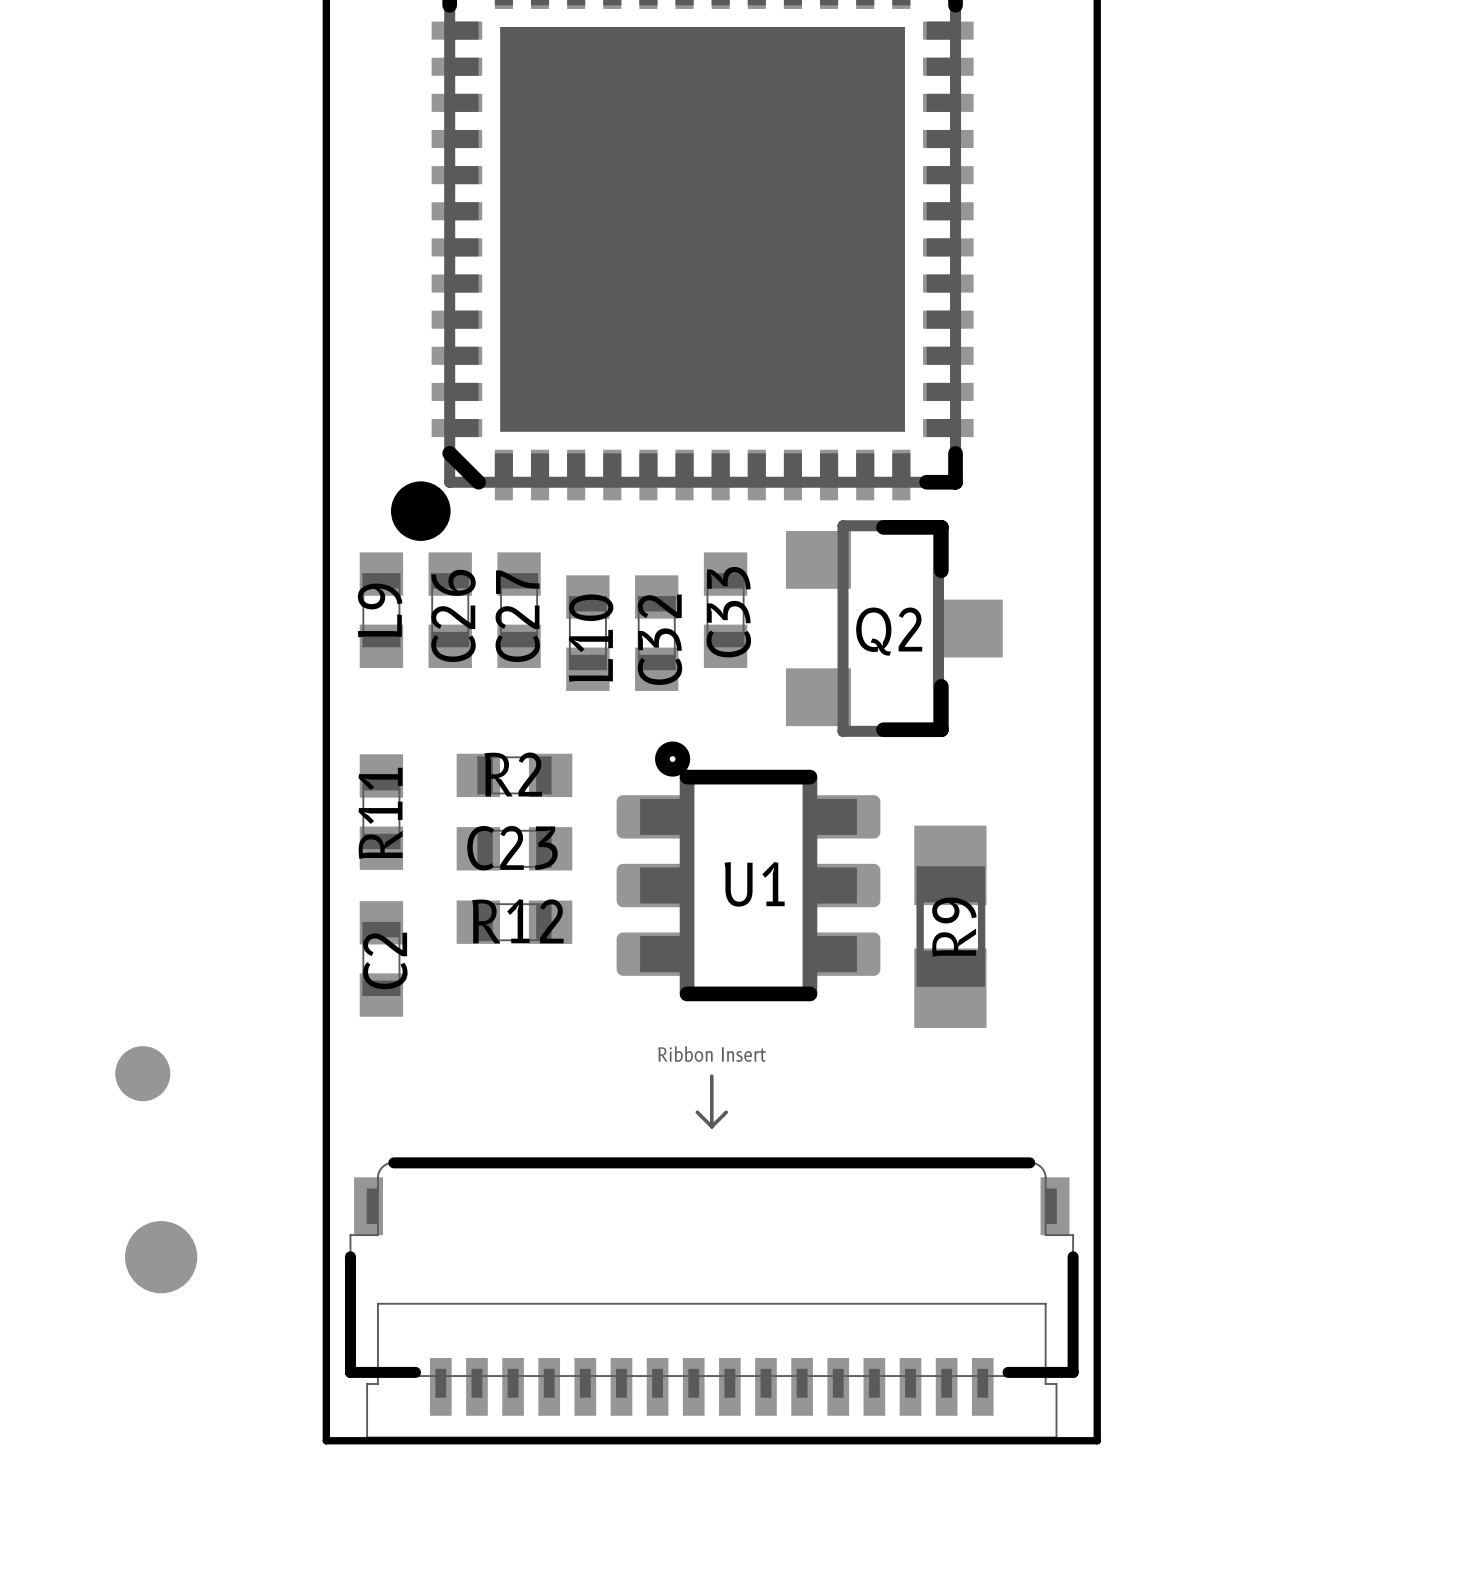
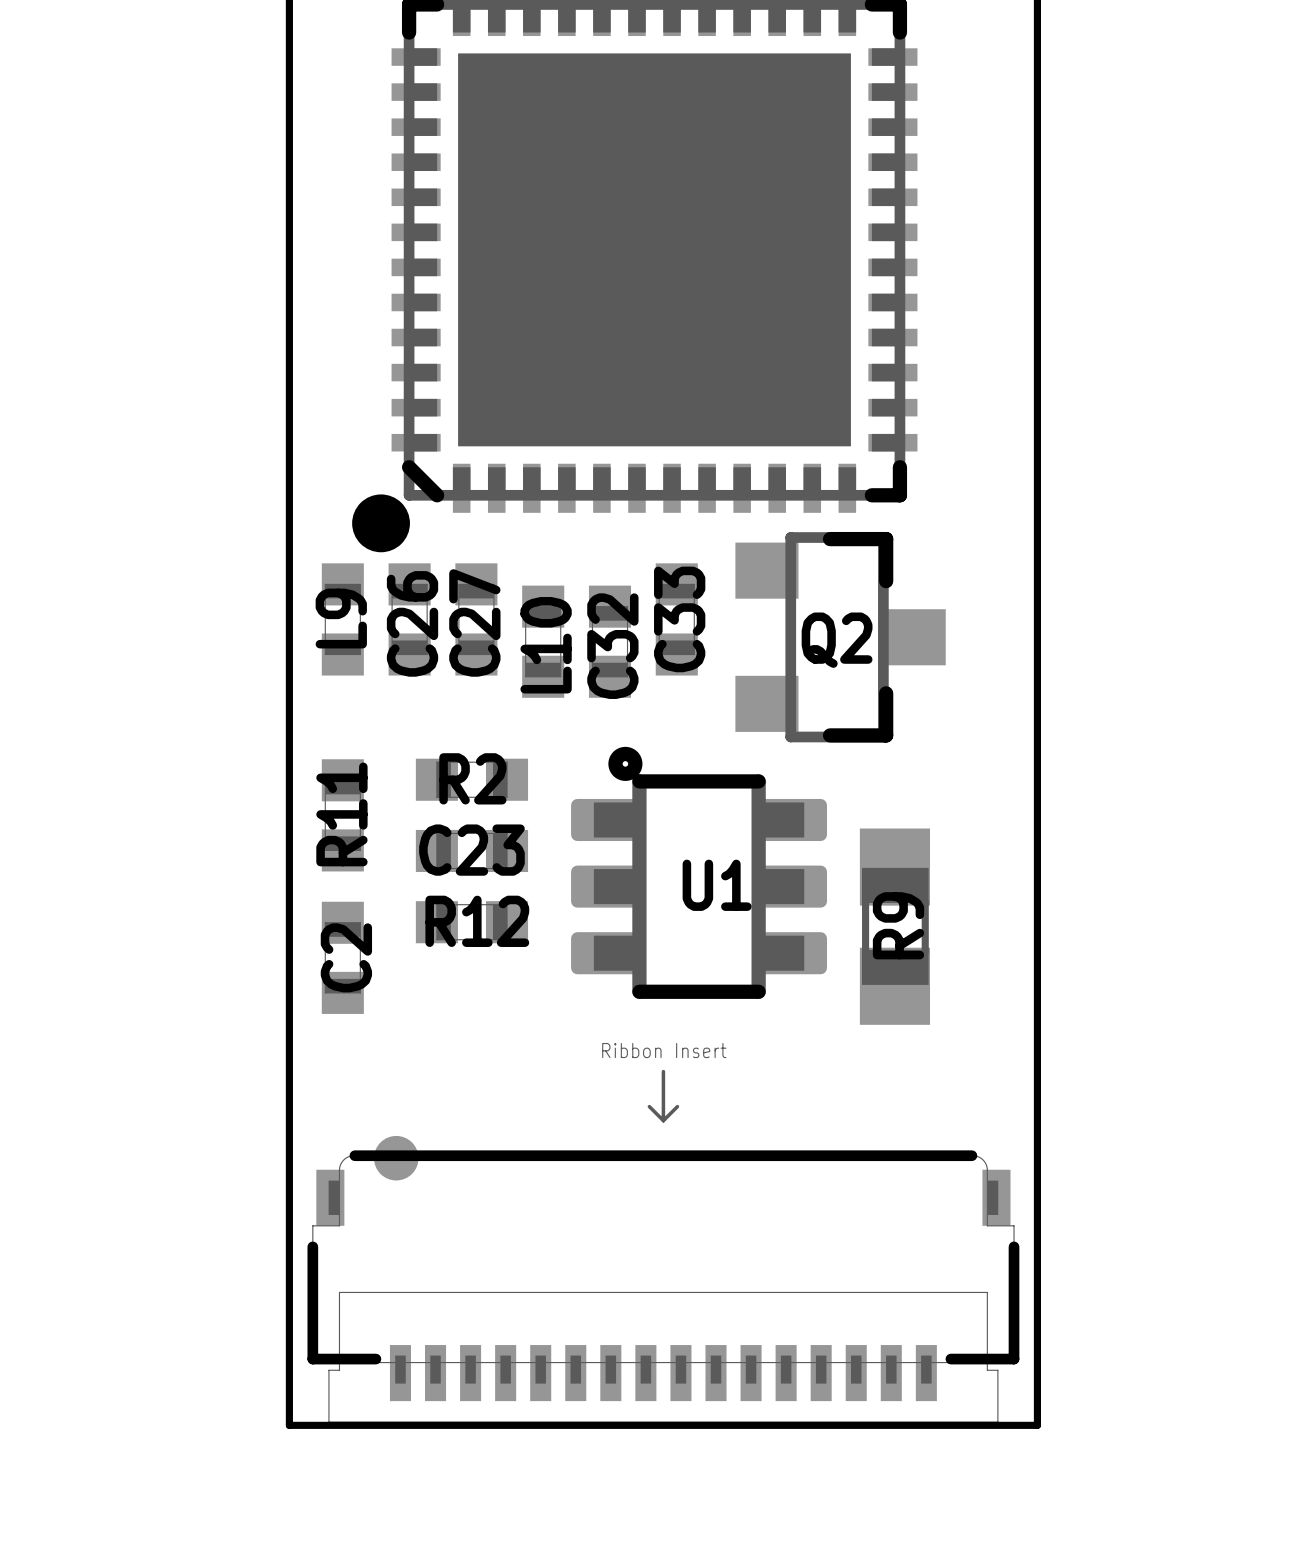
part: (142, 1073) -> none
part: none -> (396, 1158)
part: (161, 1257) -> none

